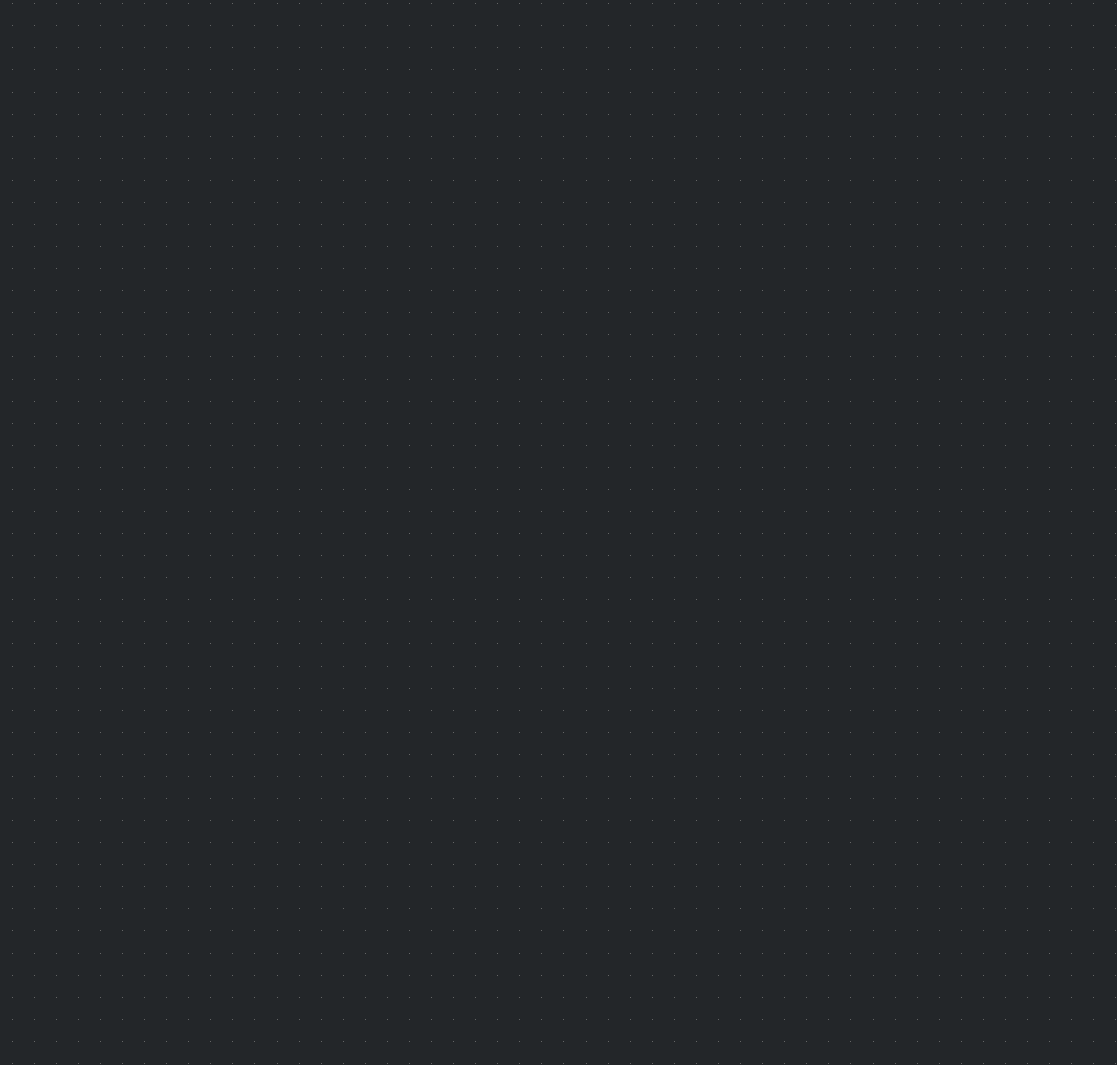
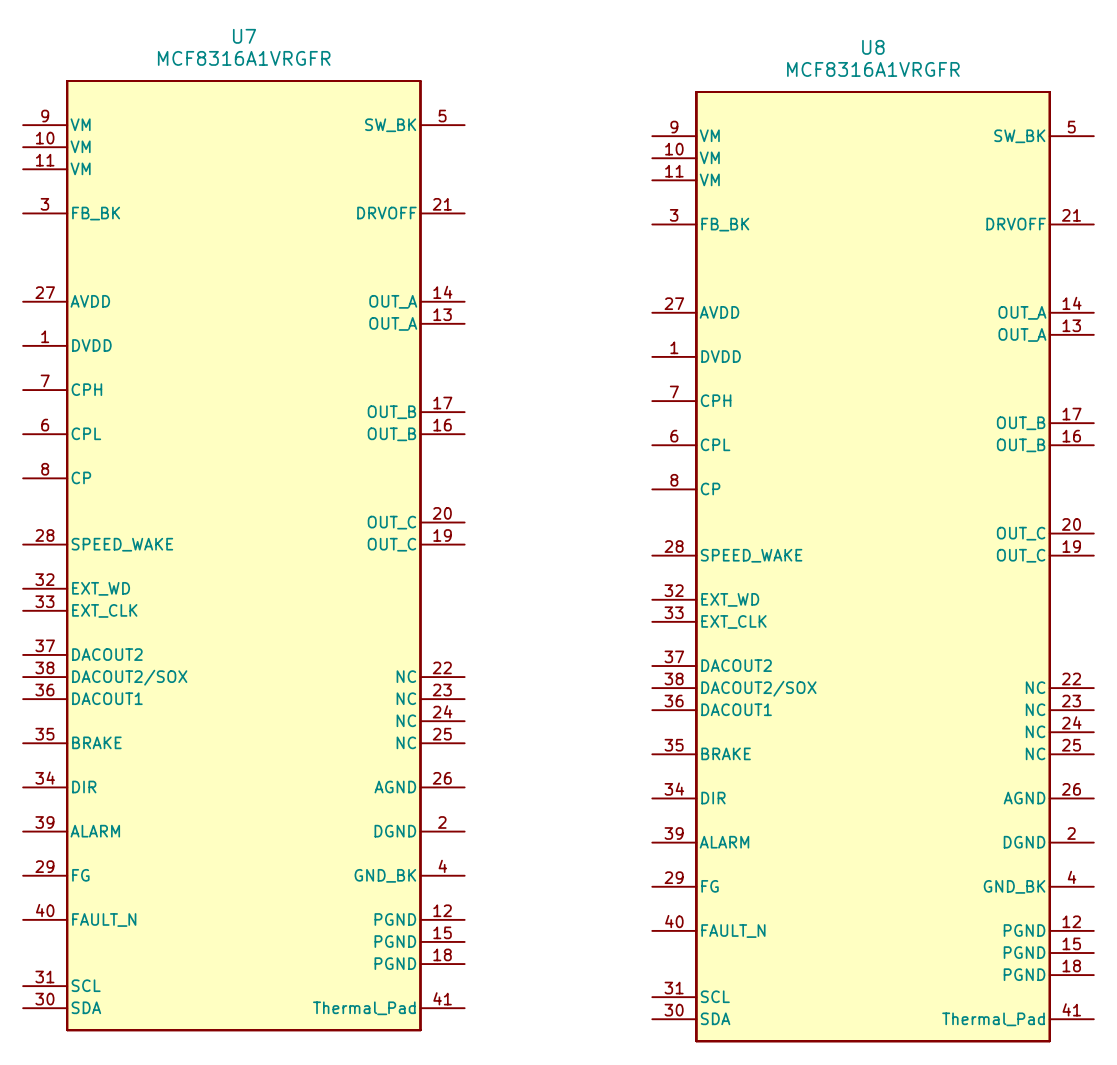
U7: none -> MCF8316A1VRGFR (243, 555)
U8: none -> MCF8316A1VRGFR (873, 566)

